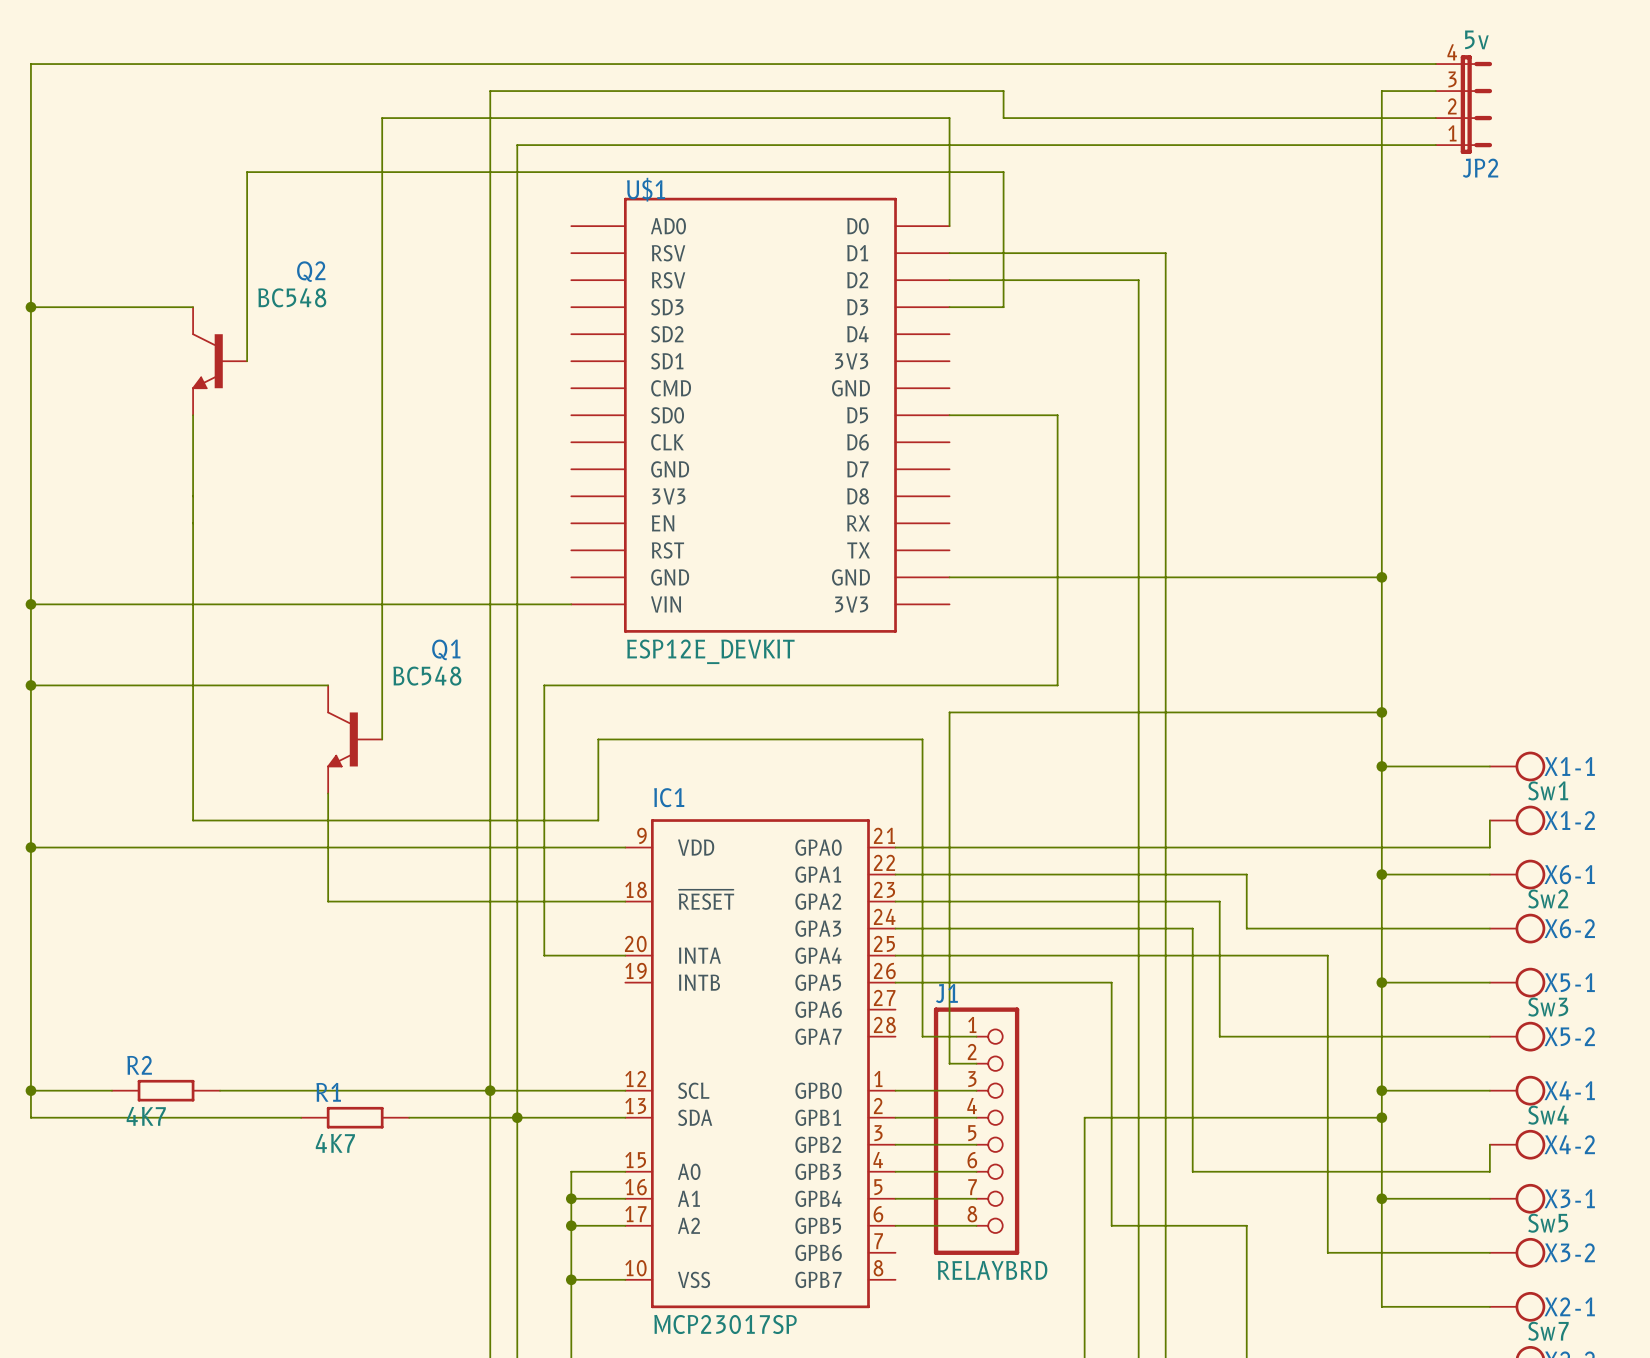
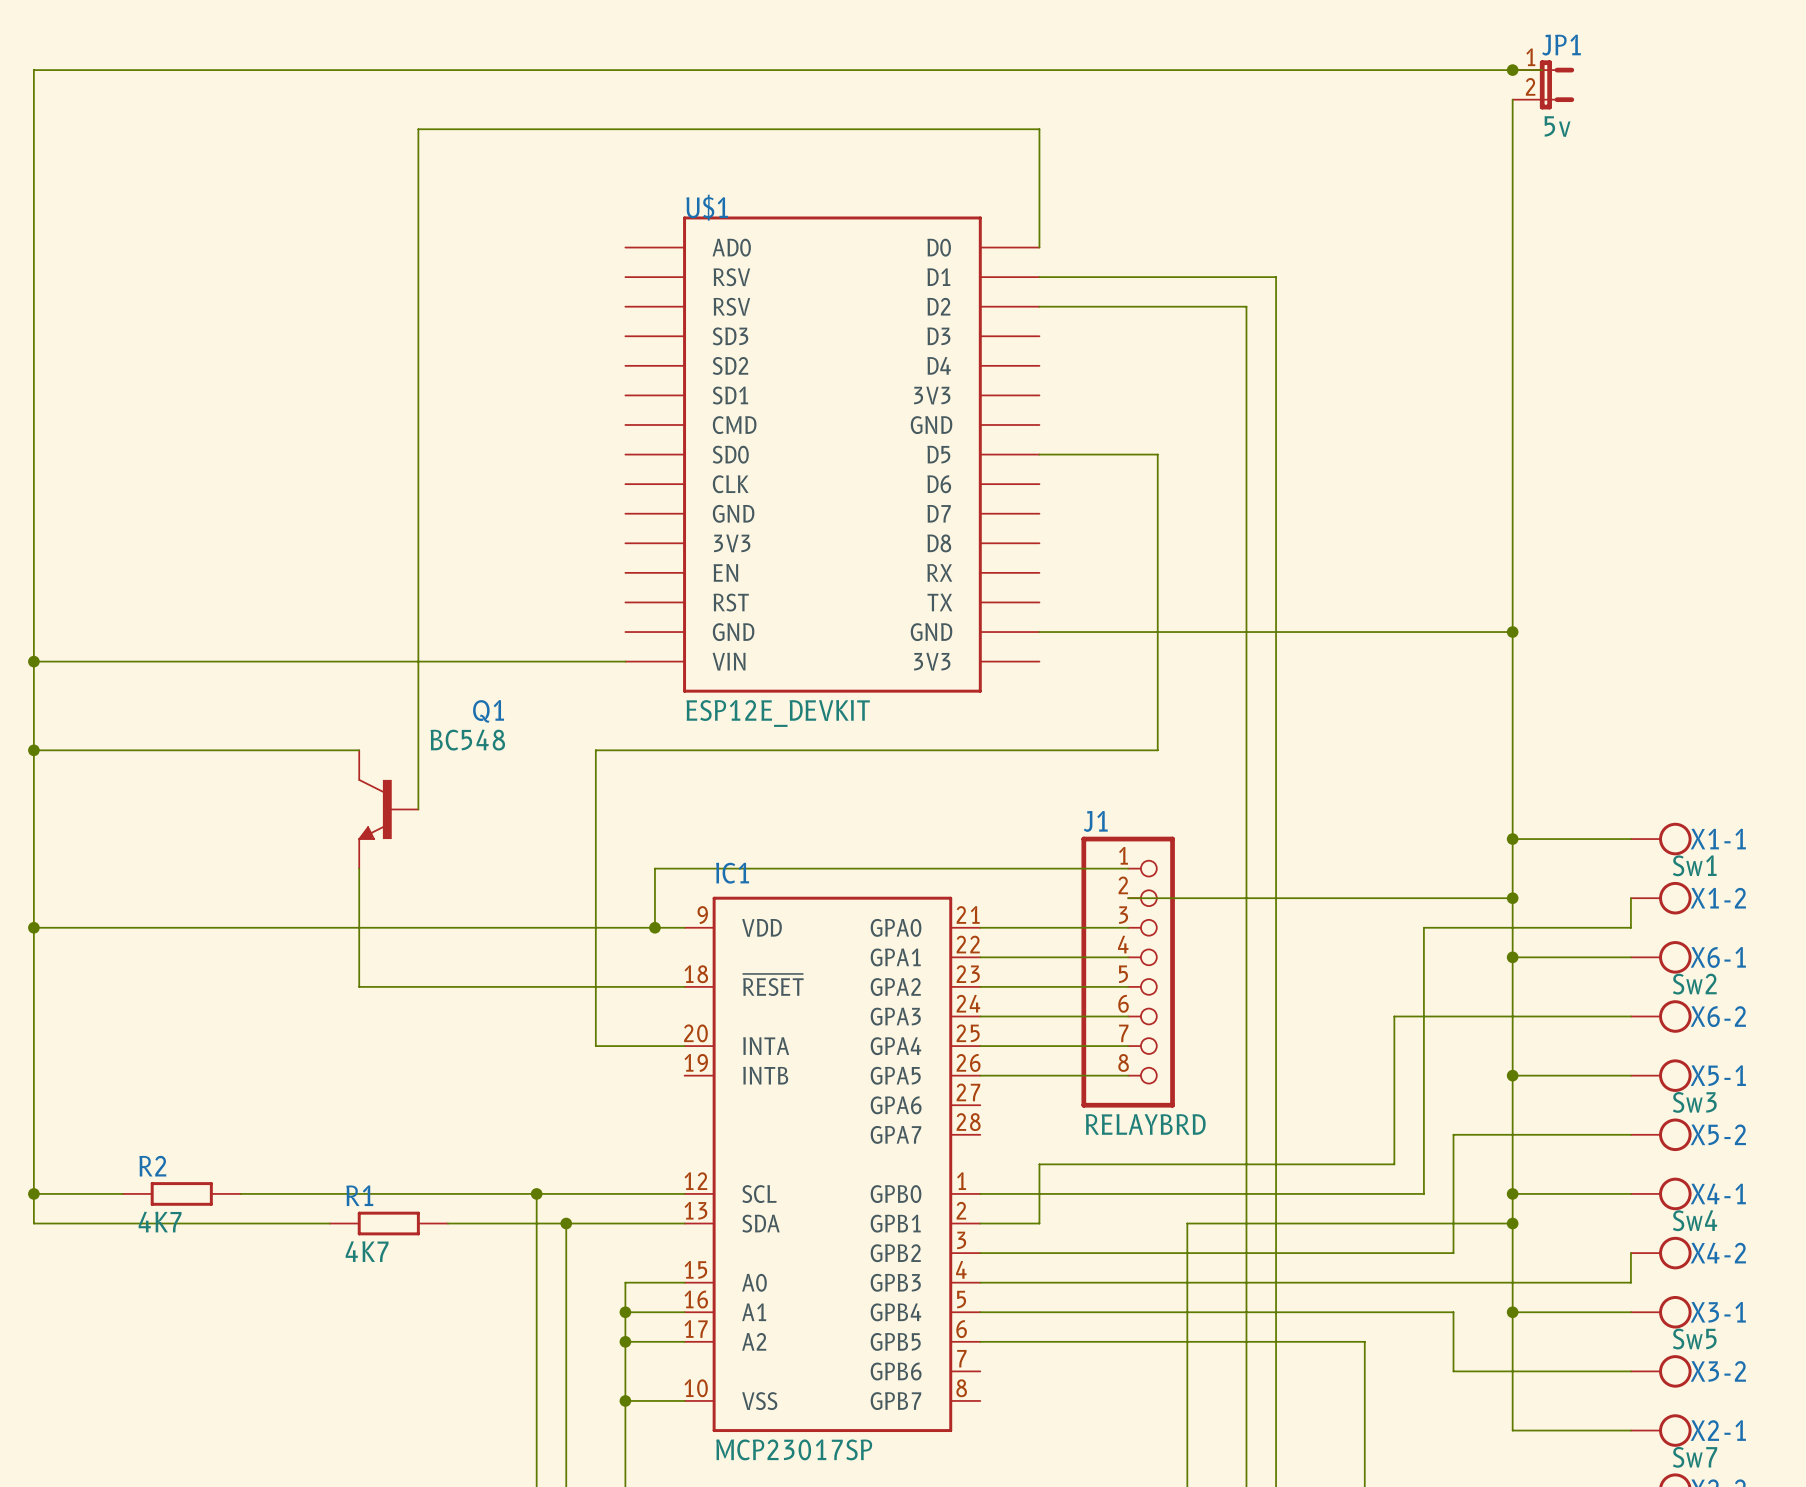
junction: none -> (1512, 70)
JP1: none -> 5v (1543, 84)
JP2: 5v (1463, 104) -> none
wire: (1435, 118) (1003, 118) (1003, 91) (490, 91) (490, 1090) -> none
wire: (1435, 145) (517, 145) (517, 1117) -> none
wire: (30, 307) (193, 307) -> none
junction: (30, 307) -> none
wire: (949, 307) (1003, 307) (1003, 172) (247, 172) (247, 361) -> none
Q2: BC548 (219, 361) -> none
wire: (193, 415) (193, 820) (598, 820) -> (654, 927) (654, 898)
wire: (1381, 712) (949, 712) (949, 1063) -> none
junction: (1381, 712) -> none
wire: (598, 793) (598, 739) (922, 739) (922, 1036) (976, 1036) -> (654, 868) (1128, 868)
wire: none -> (1128, 898) (1512, 898)
junction: none -> (1512, 898)
junction: none -> (654, 927)
wire: (1030, 847) (1300, 847) -> (1069, 1193) (1423, 1193) (1423, 927)
wire: (1030, 874) (1246, 874) (1246, 928) (1273, 928) -> (1069, 1164) (1394, 1164) (1394, 1016)
wire: (1030, 901) (1219, 901) (1219, 1036) (1327, 1036) (1327, 955) (1030, 955) -> none
wire: (1030, 928) (1192, 928) (1192, 1171) -> (1069, 1282) (1305, 1282)
wire: (1030, 982) (1111, 982) (1111, 1225) -> (1069, 1341) (1216, 1341)
wire: (949, 1117) (976, 1117) -> (1039, 1223) (1039, 1164)
J1 position: (976, 1131) -> (1128, 972)
wire: (1327, 1144) (1327, 1198) -> (1453, 1253) (1069, 1253)
wire: none -> (1069, 1312) (1453, 1312)

